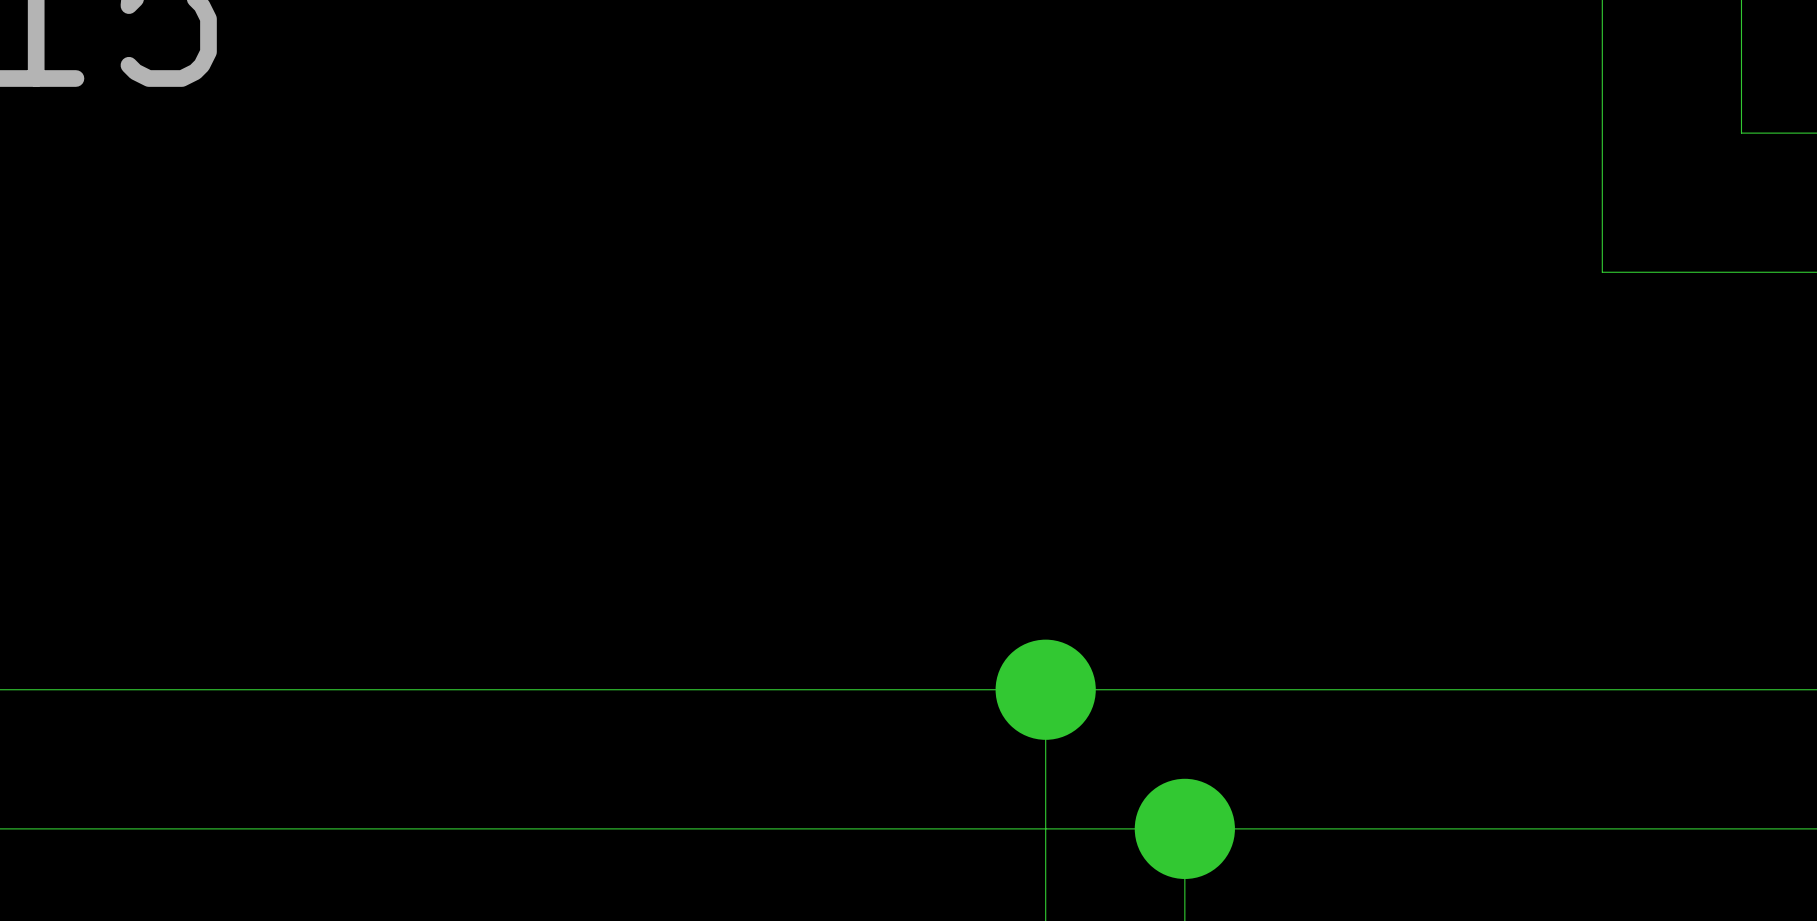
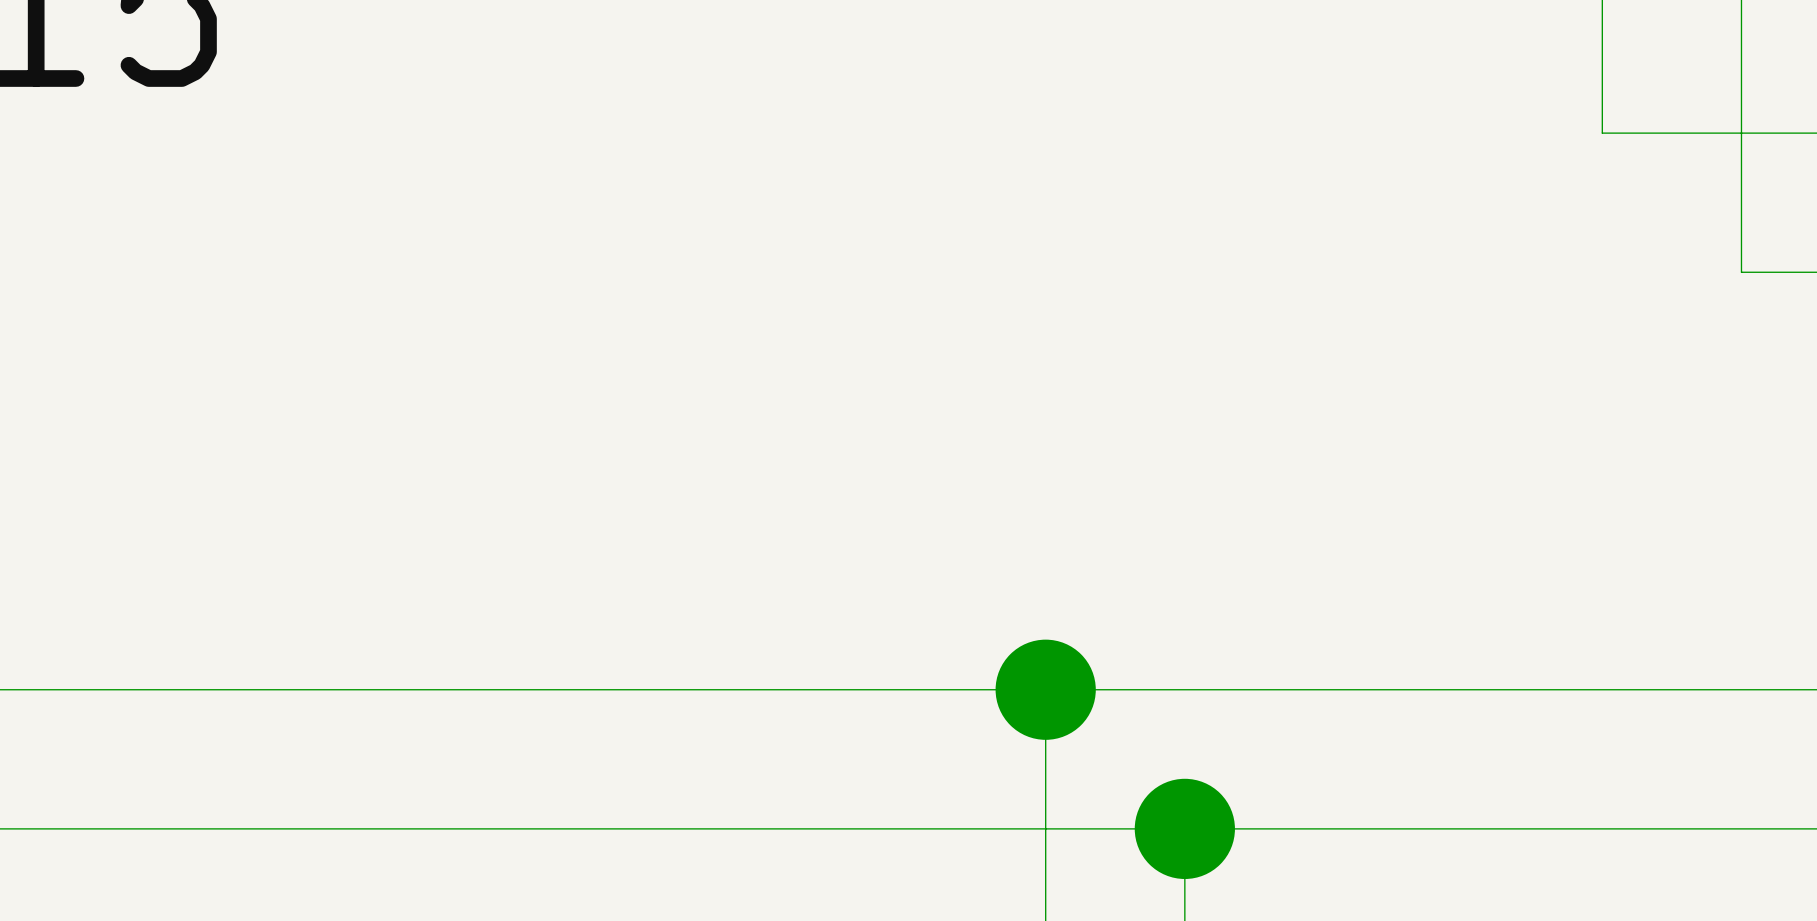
wire: (1602, 133) (1602, 272) (1741, 272) -> (1602, 133) (1741, 133) (1741, 272)

